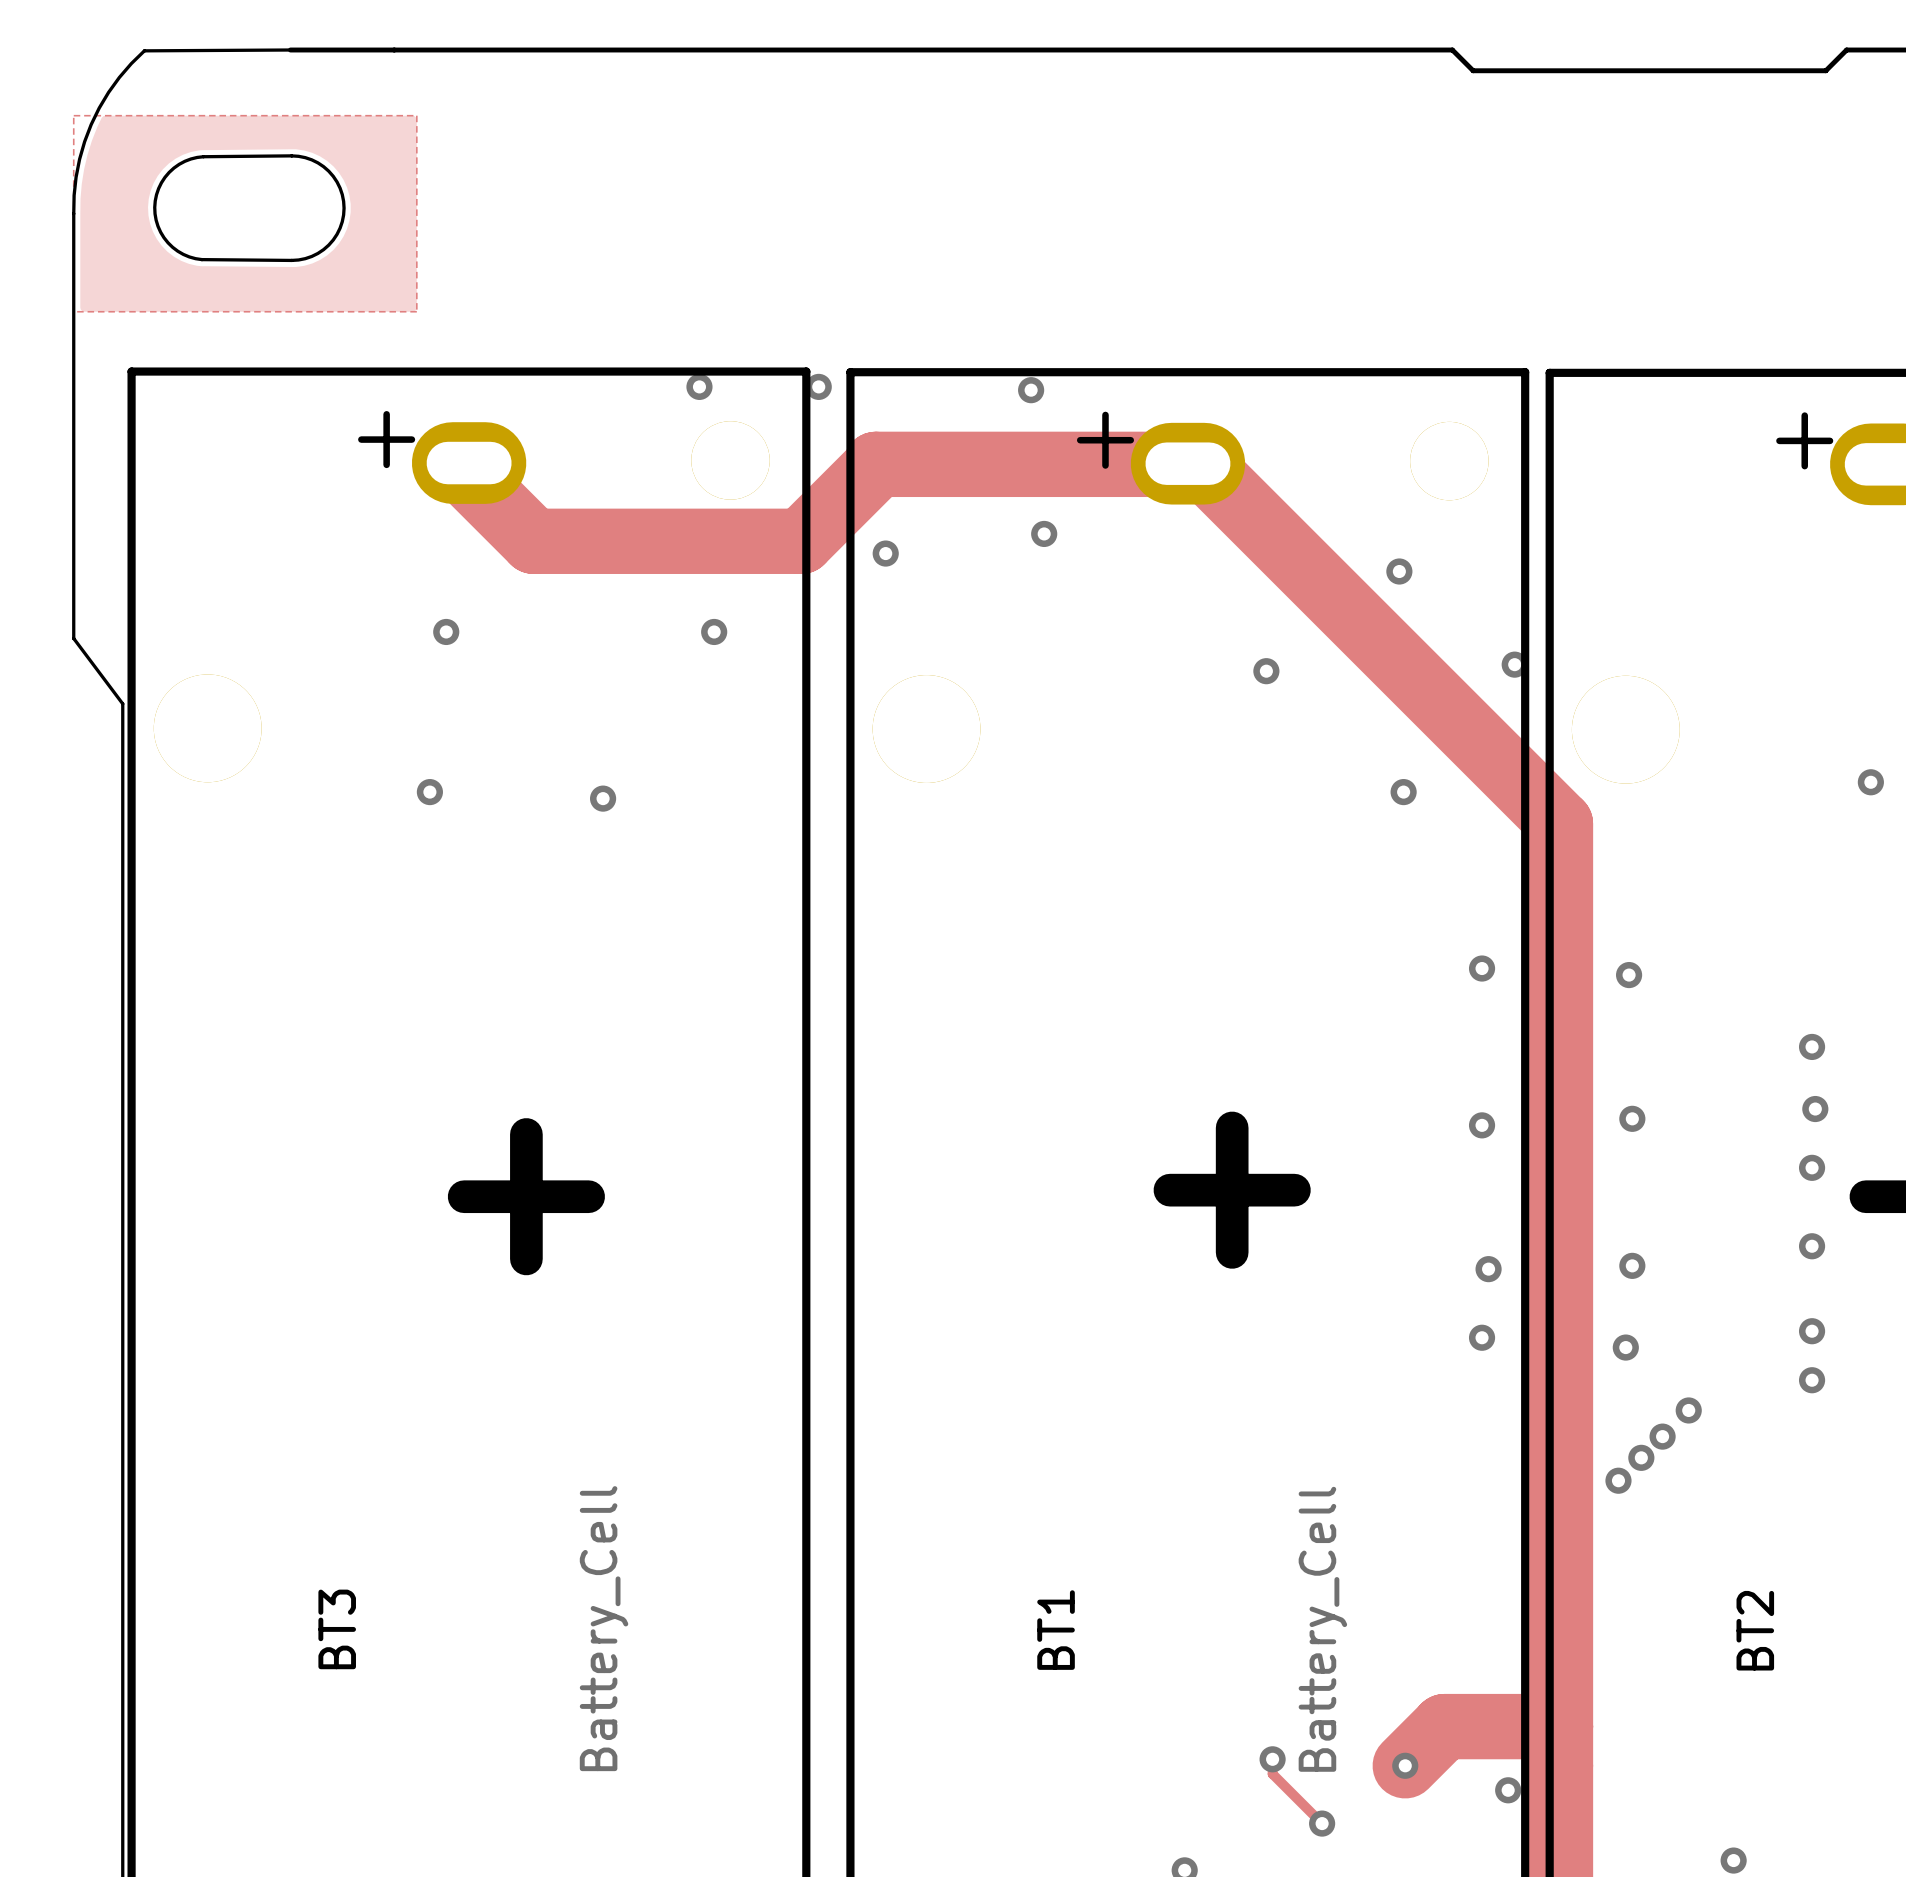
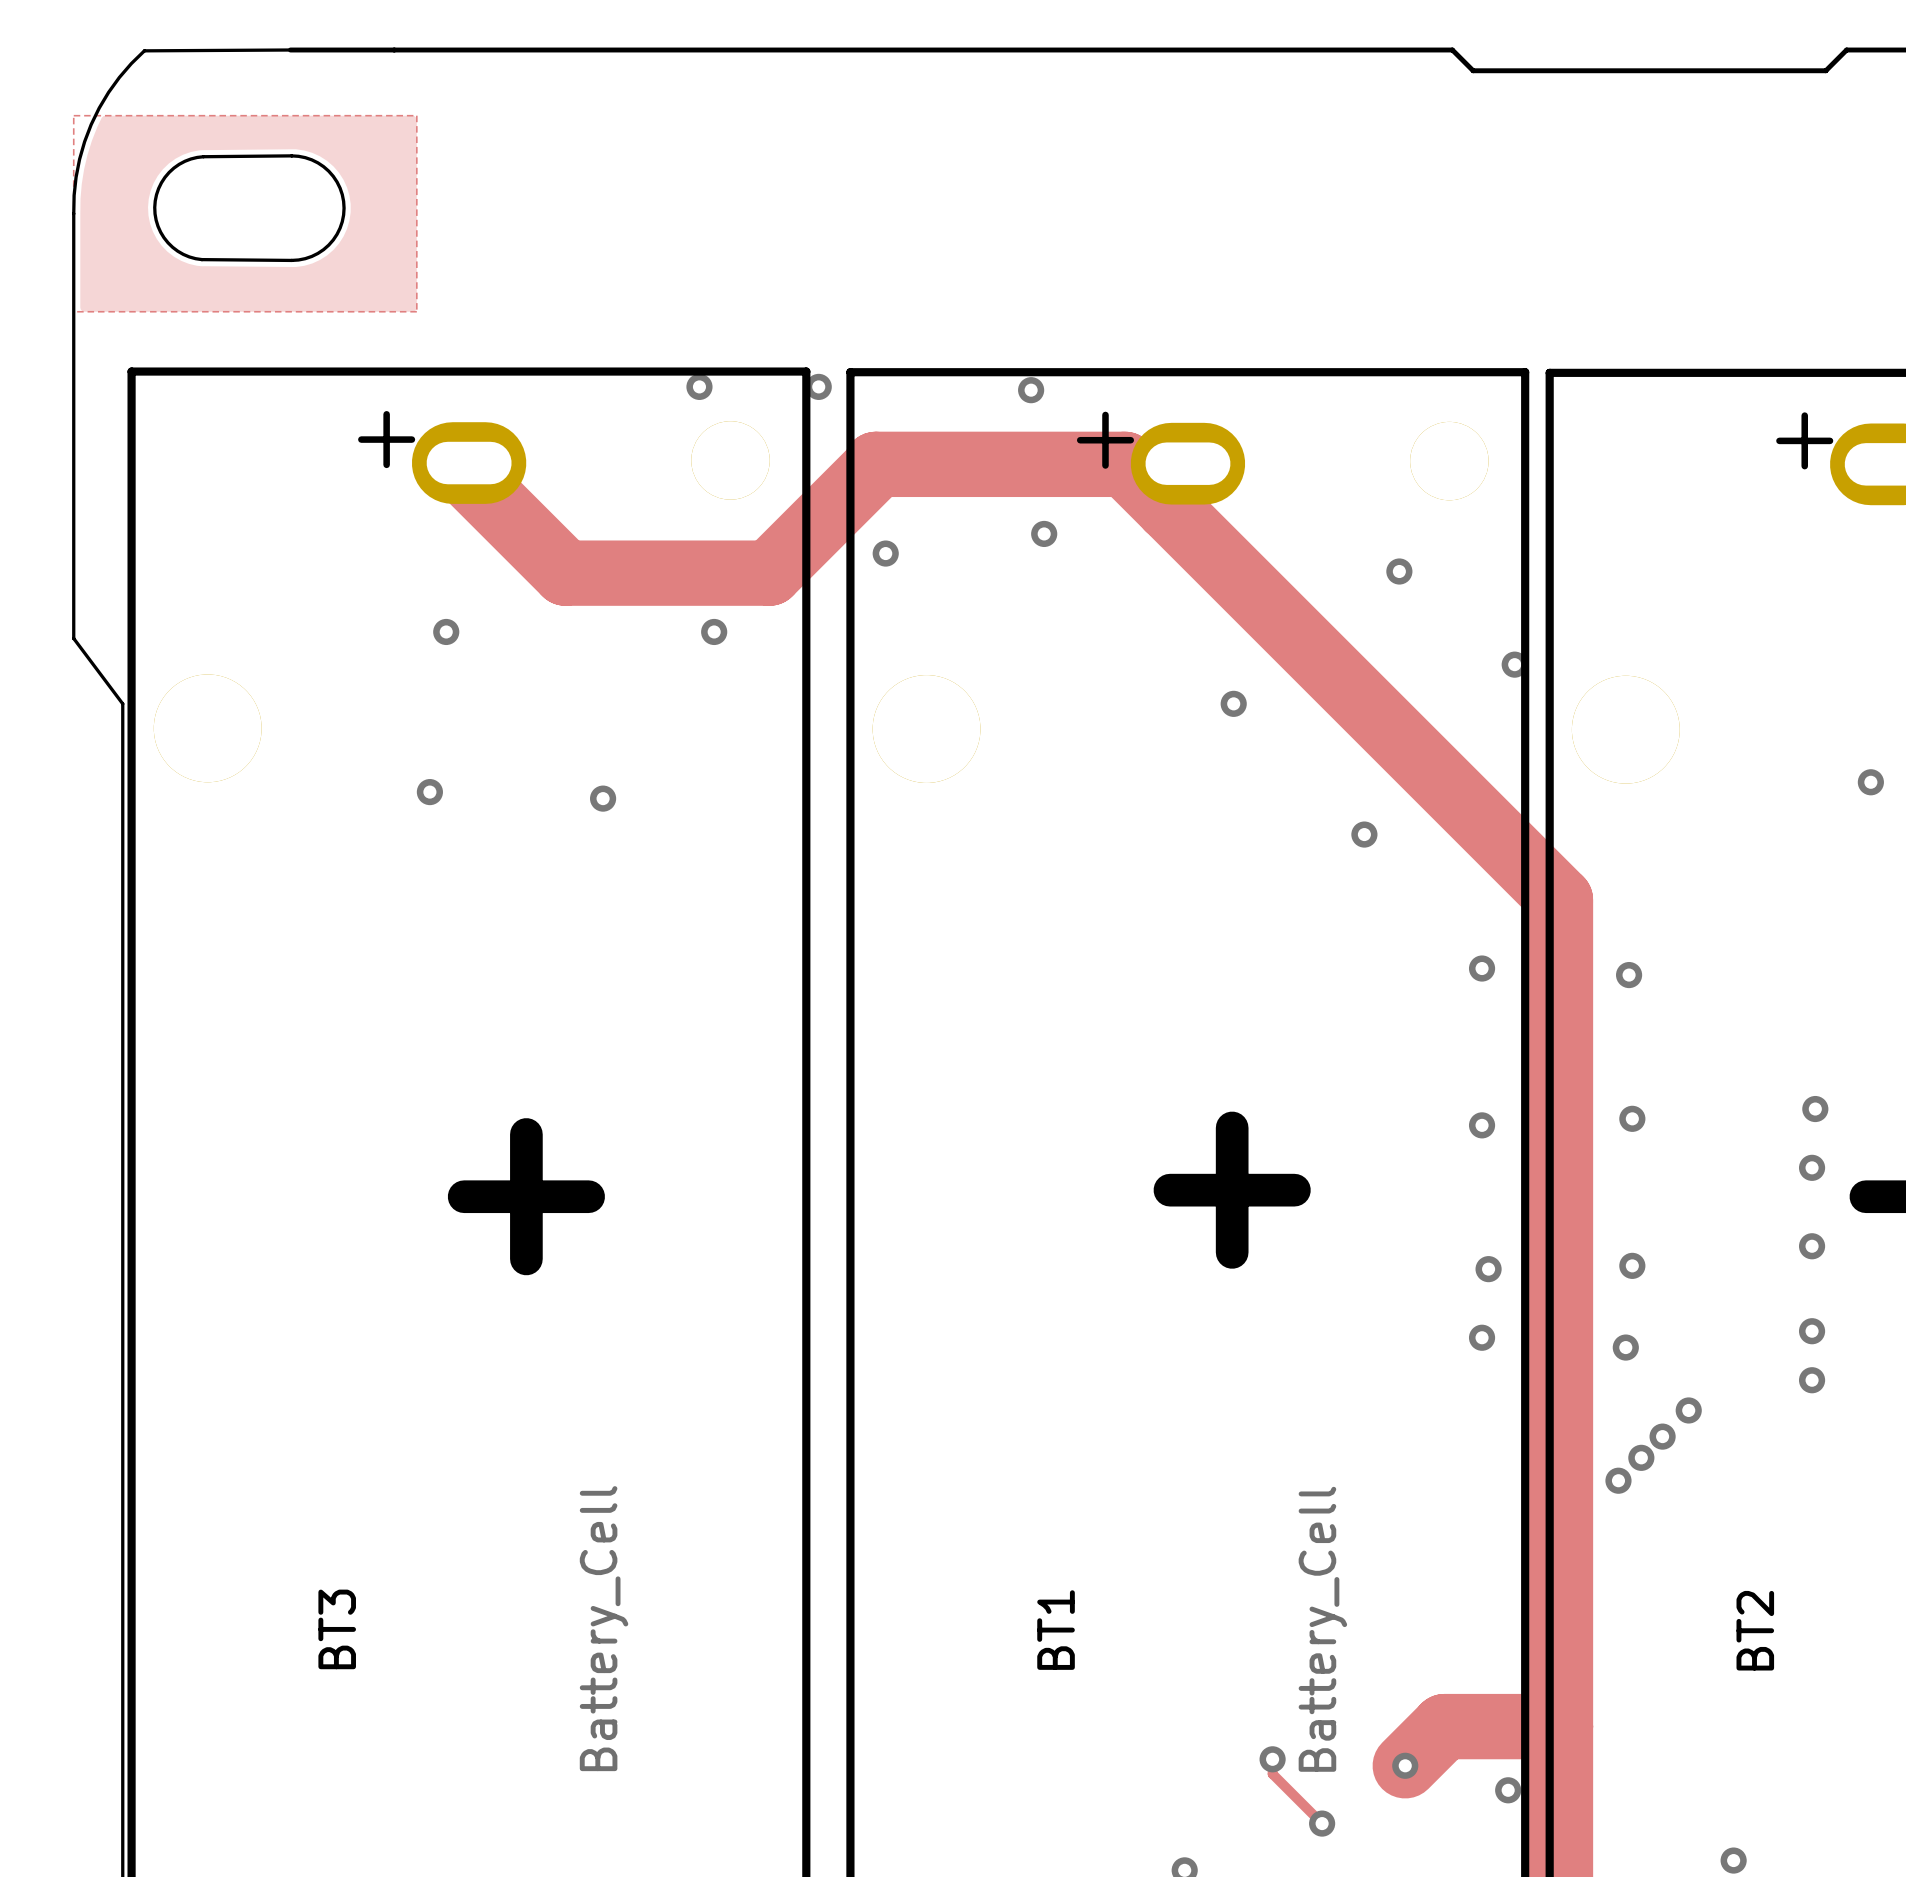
track: (1124, 464) (1201, 464) (1560, 823) (1560, 899) -> (1124, 464) (1560, 899)
track: (533, 541) (801, 541) -> (533, 541) (565, 573) (769, 573) (801, 541)
via position: (1266, 671) -> (1233, 703)
via position: (1403, 792) -> (1364, 834)
via: (1812, 1046) -> none

